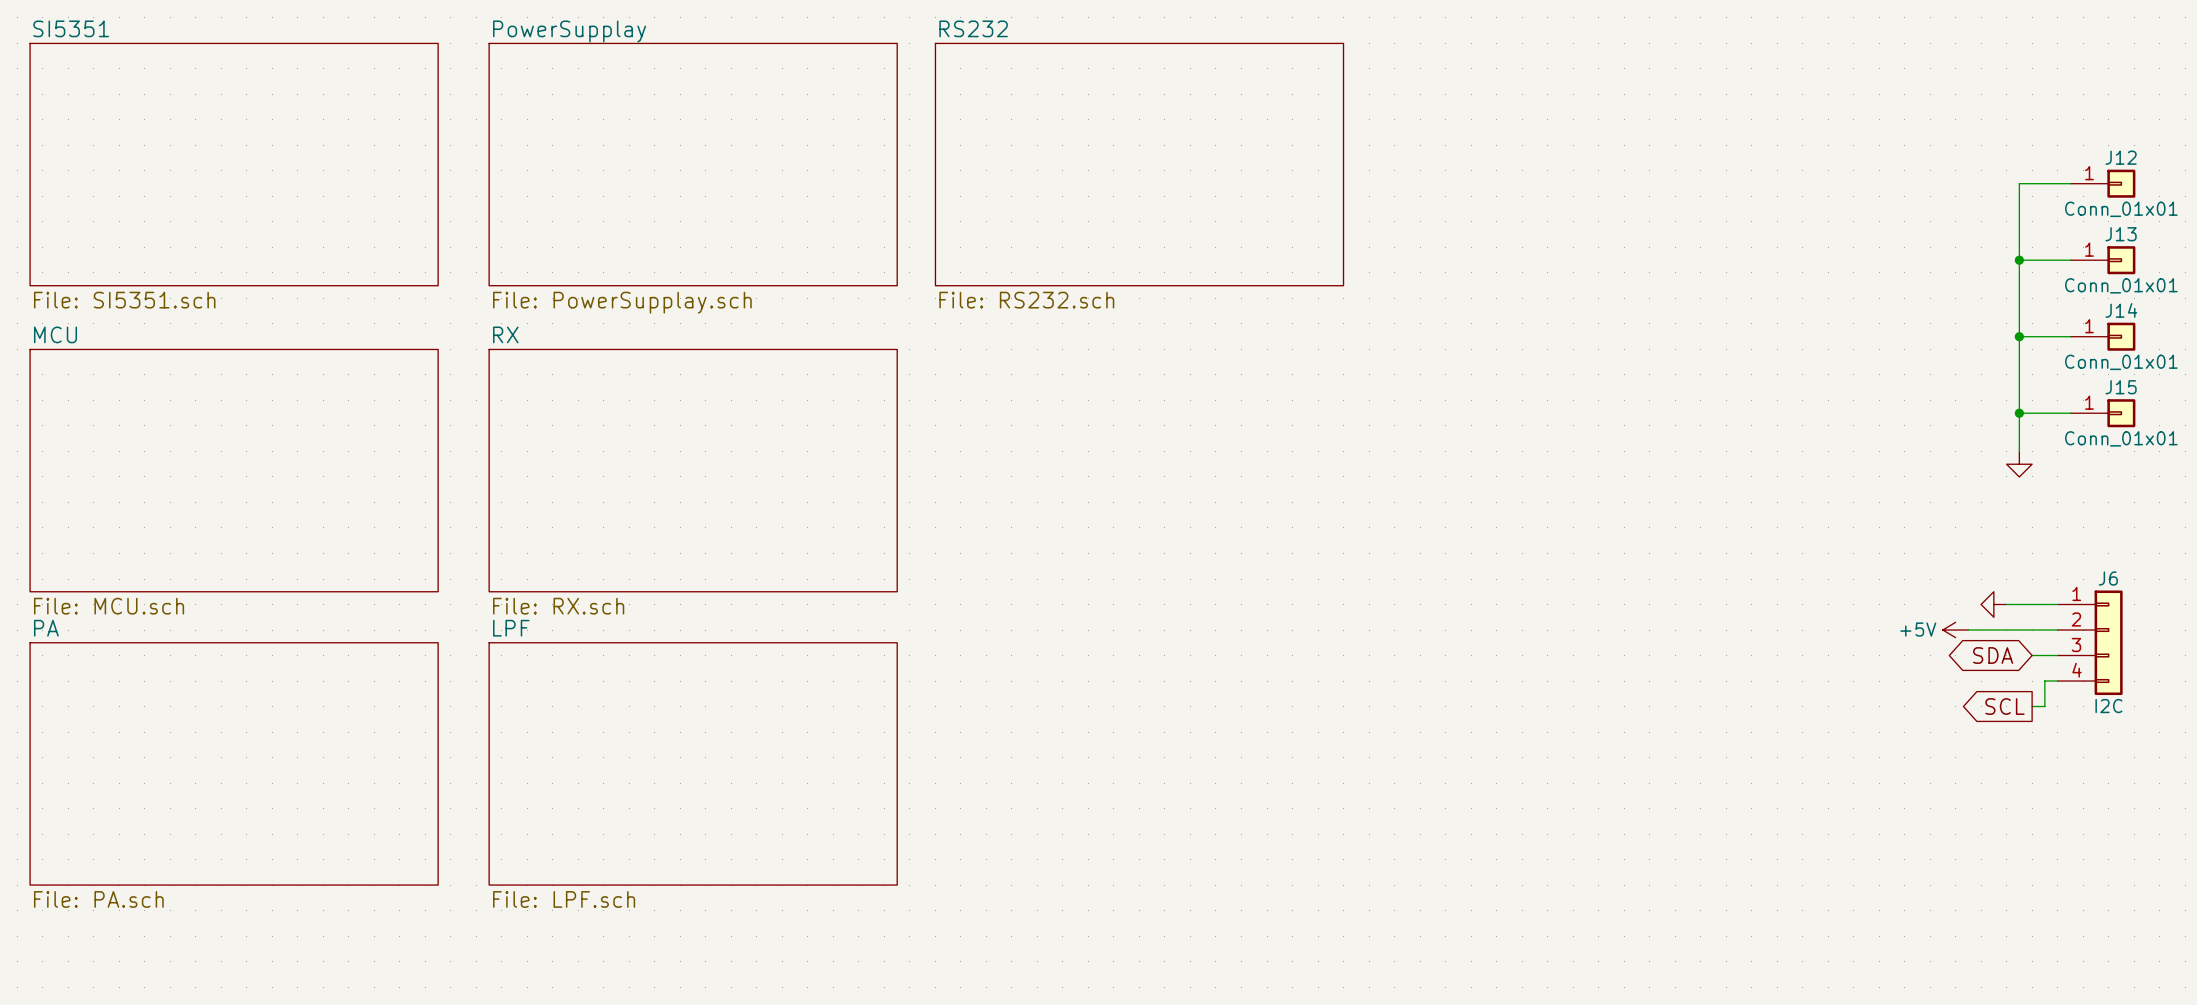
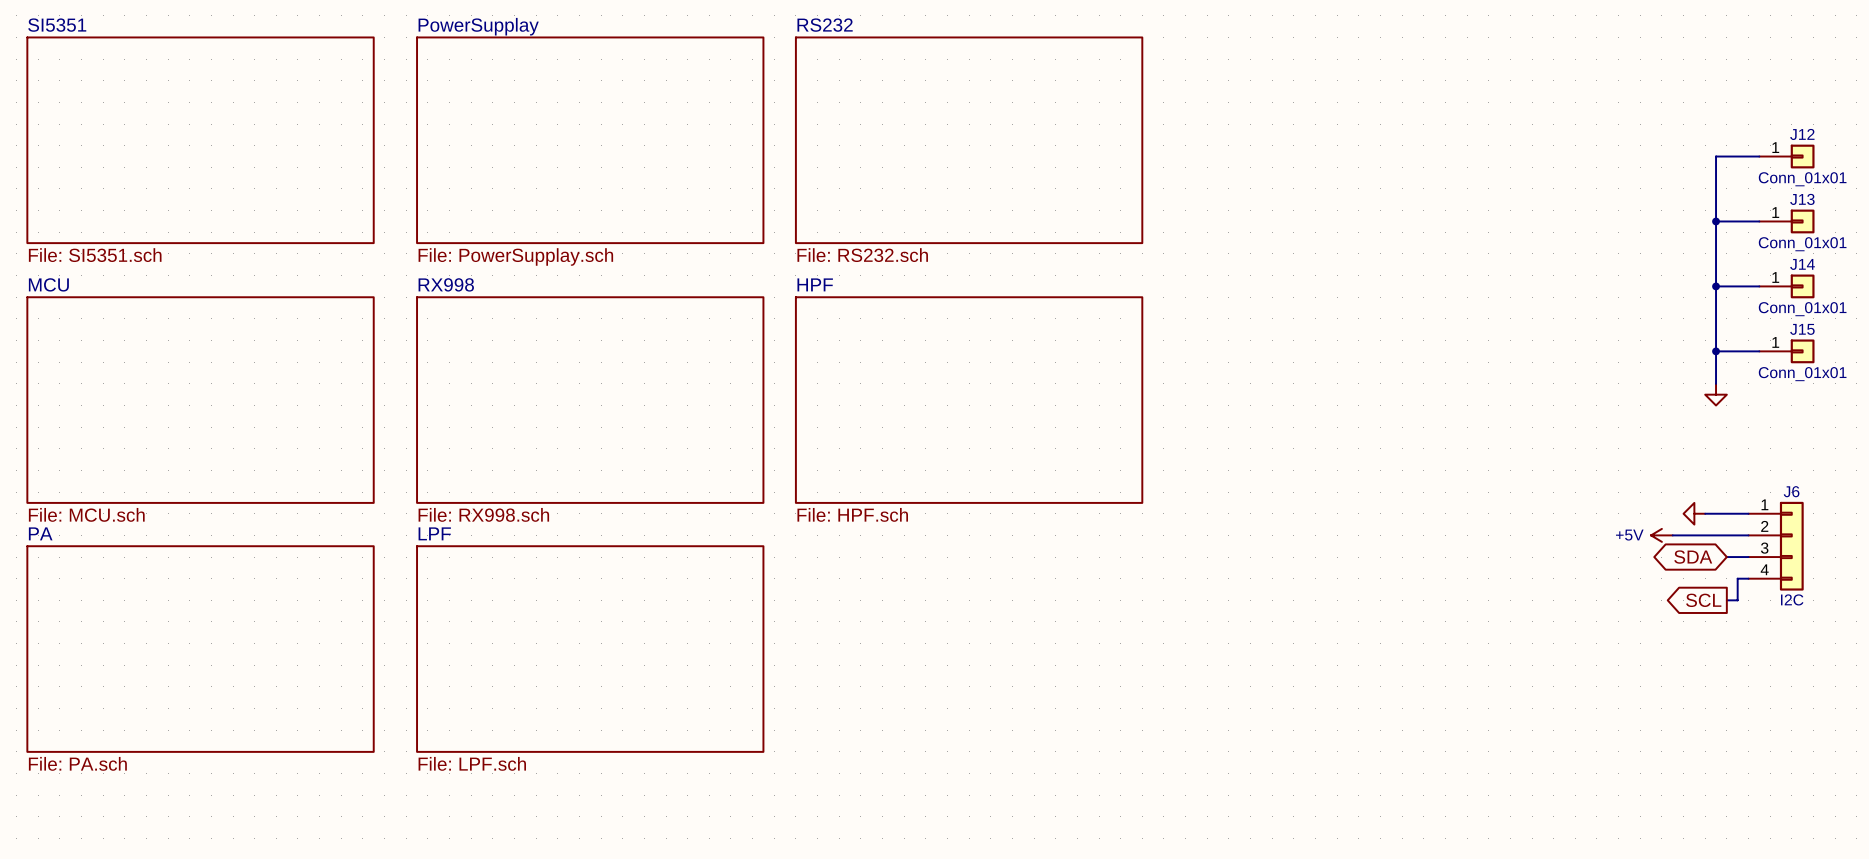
sheet RX name: RX (505, 334) -> RX998 (446, 284)
sheet HPF: none -> File: HPF.sch (969, 400)
sheet RX value: File: RX.sch (558, 606) -> File: RX998.sch (483, 514)

